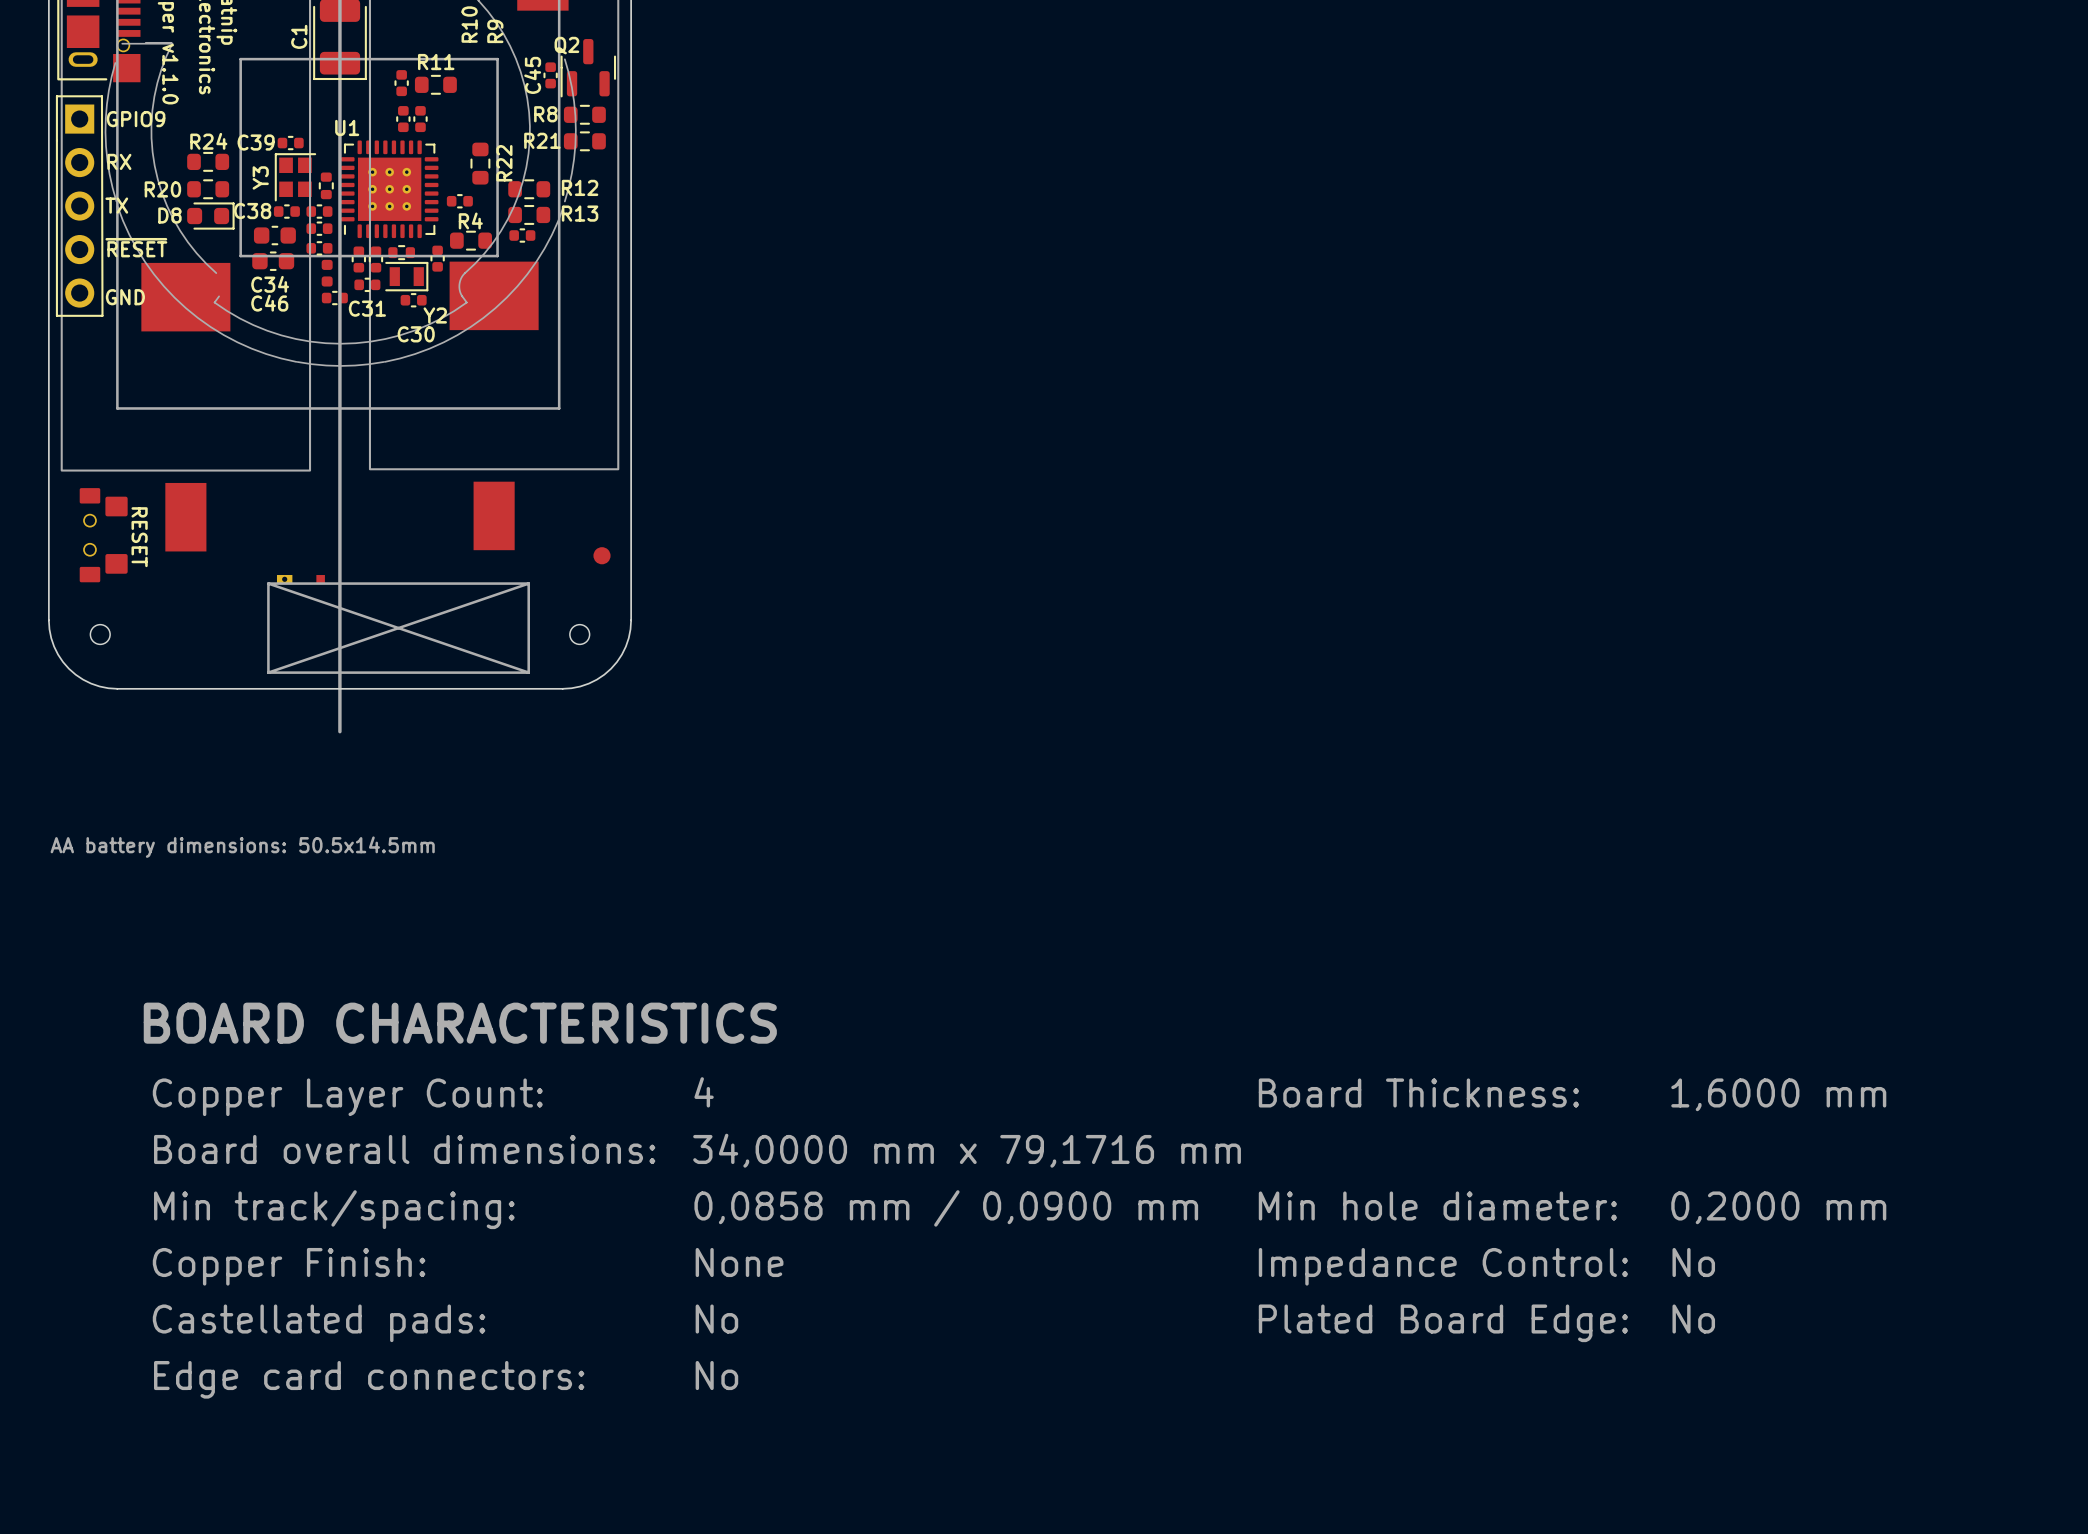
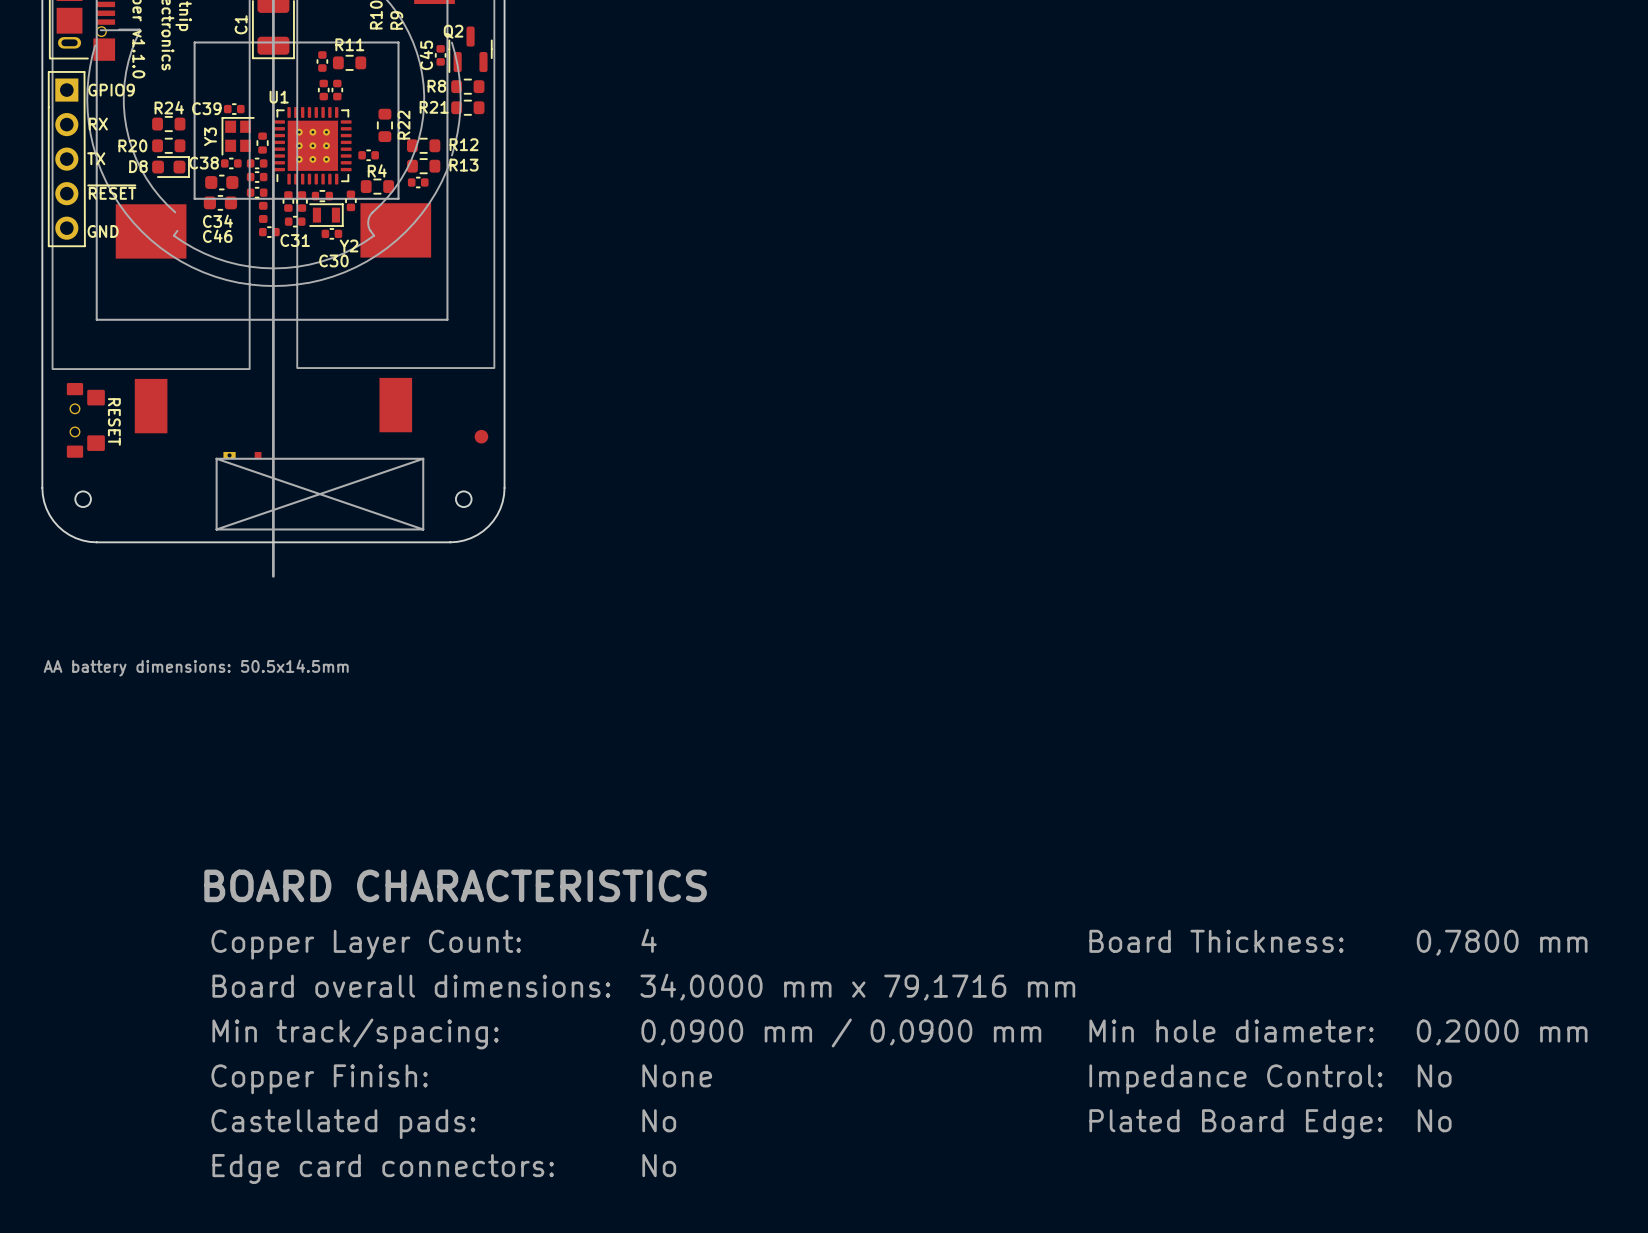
text position: BOARD CHARACTERISTICS (460, 1023) -> BOARD CHARACTERISTICS (455, 885)
text position: 4 (704, 1092) -> 4 (649, 940)
text position: Board Thickness: (1418, 1092) -> Board Thickness: (1216, 941)
text: 1,6000 mm (1778, 1094) -> none
text position: Copper Layer Count: (347, 1097) -> Copper Layer Count: (366, 944)
text position: Board overall dimensions: (404, 1149) -> Board overall dimensions: (411, 986)
text position: 34,0000 mm x 79,1716 mm (967, 1150) -> 34,0000 mm x 79,1716 mm (857, 987)
text: none -> 0,7800 mm (1502, 942)
text position: Min hole diameter: (1437, 1205) -> Min hole diameter: (1231, 1031)
text position: 0,2000 mm (1778, 1207) -> 0,2000 mm (1502, 1032)
text: 0,0858 mm / 0,0900 mm (946, 1208) -> none
text position: Min track/spacing: (334, 1209) -> Min track/spacing: (355, 1033)
text position: None (739, 1262) -> None (677, 1075)
text: No (1693, 1262) -> none
text position: Copper Finish: (289, 1266) -> Copper Finish: (319, 1079)
text position: Impedance Control: (1443, 1266) -> Impedance Control: (1235, 1079)
text: none -> 0,0900 mm / 0,0900 mm (841, 1032)
text: No (716, 1319) -> none
text: No (1693, 1319) -> none
text position: Castellated pads: (319, 1323) -> Castellated pads: (343, 1124)
text position: Plated Board Edge: (1443, 1323) -> Plated Board Edge: (1235, 1124)
text: none -> No (1434, 1075)
text: No (716, 1375) -> none
text position: Edge card connectors: (369, 1379) -> Edge card connectors: (383, 1169)
text: none -> No (659, 1120)
text: none -> No (1434, 1120)
text: none -> No (659, 1165)

